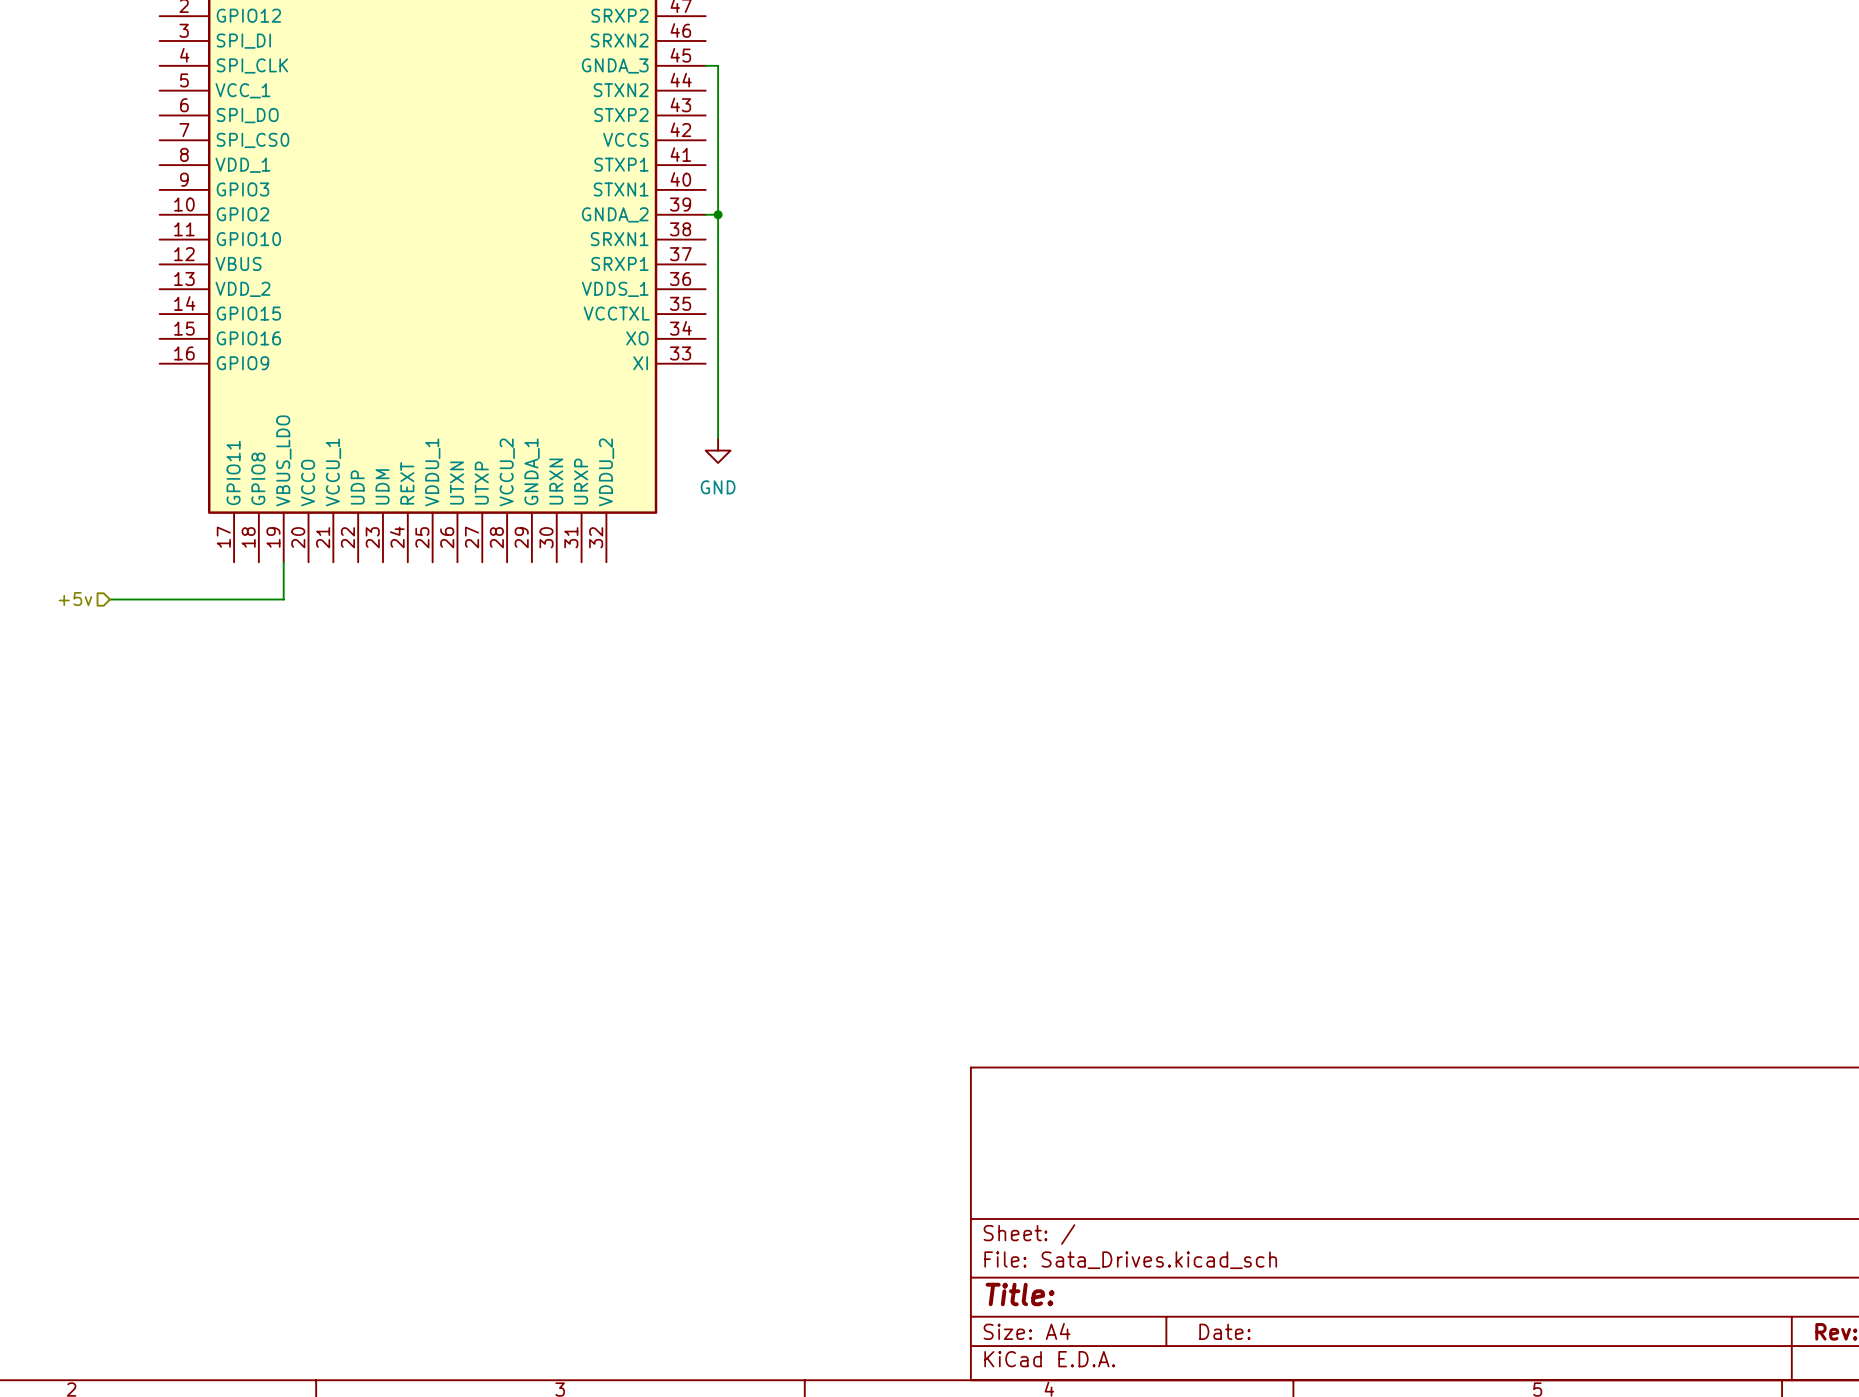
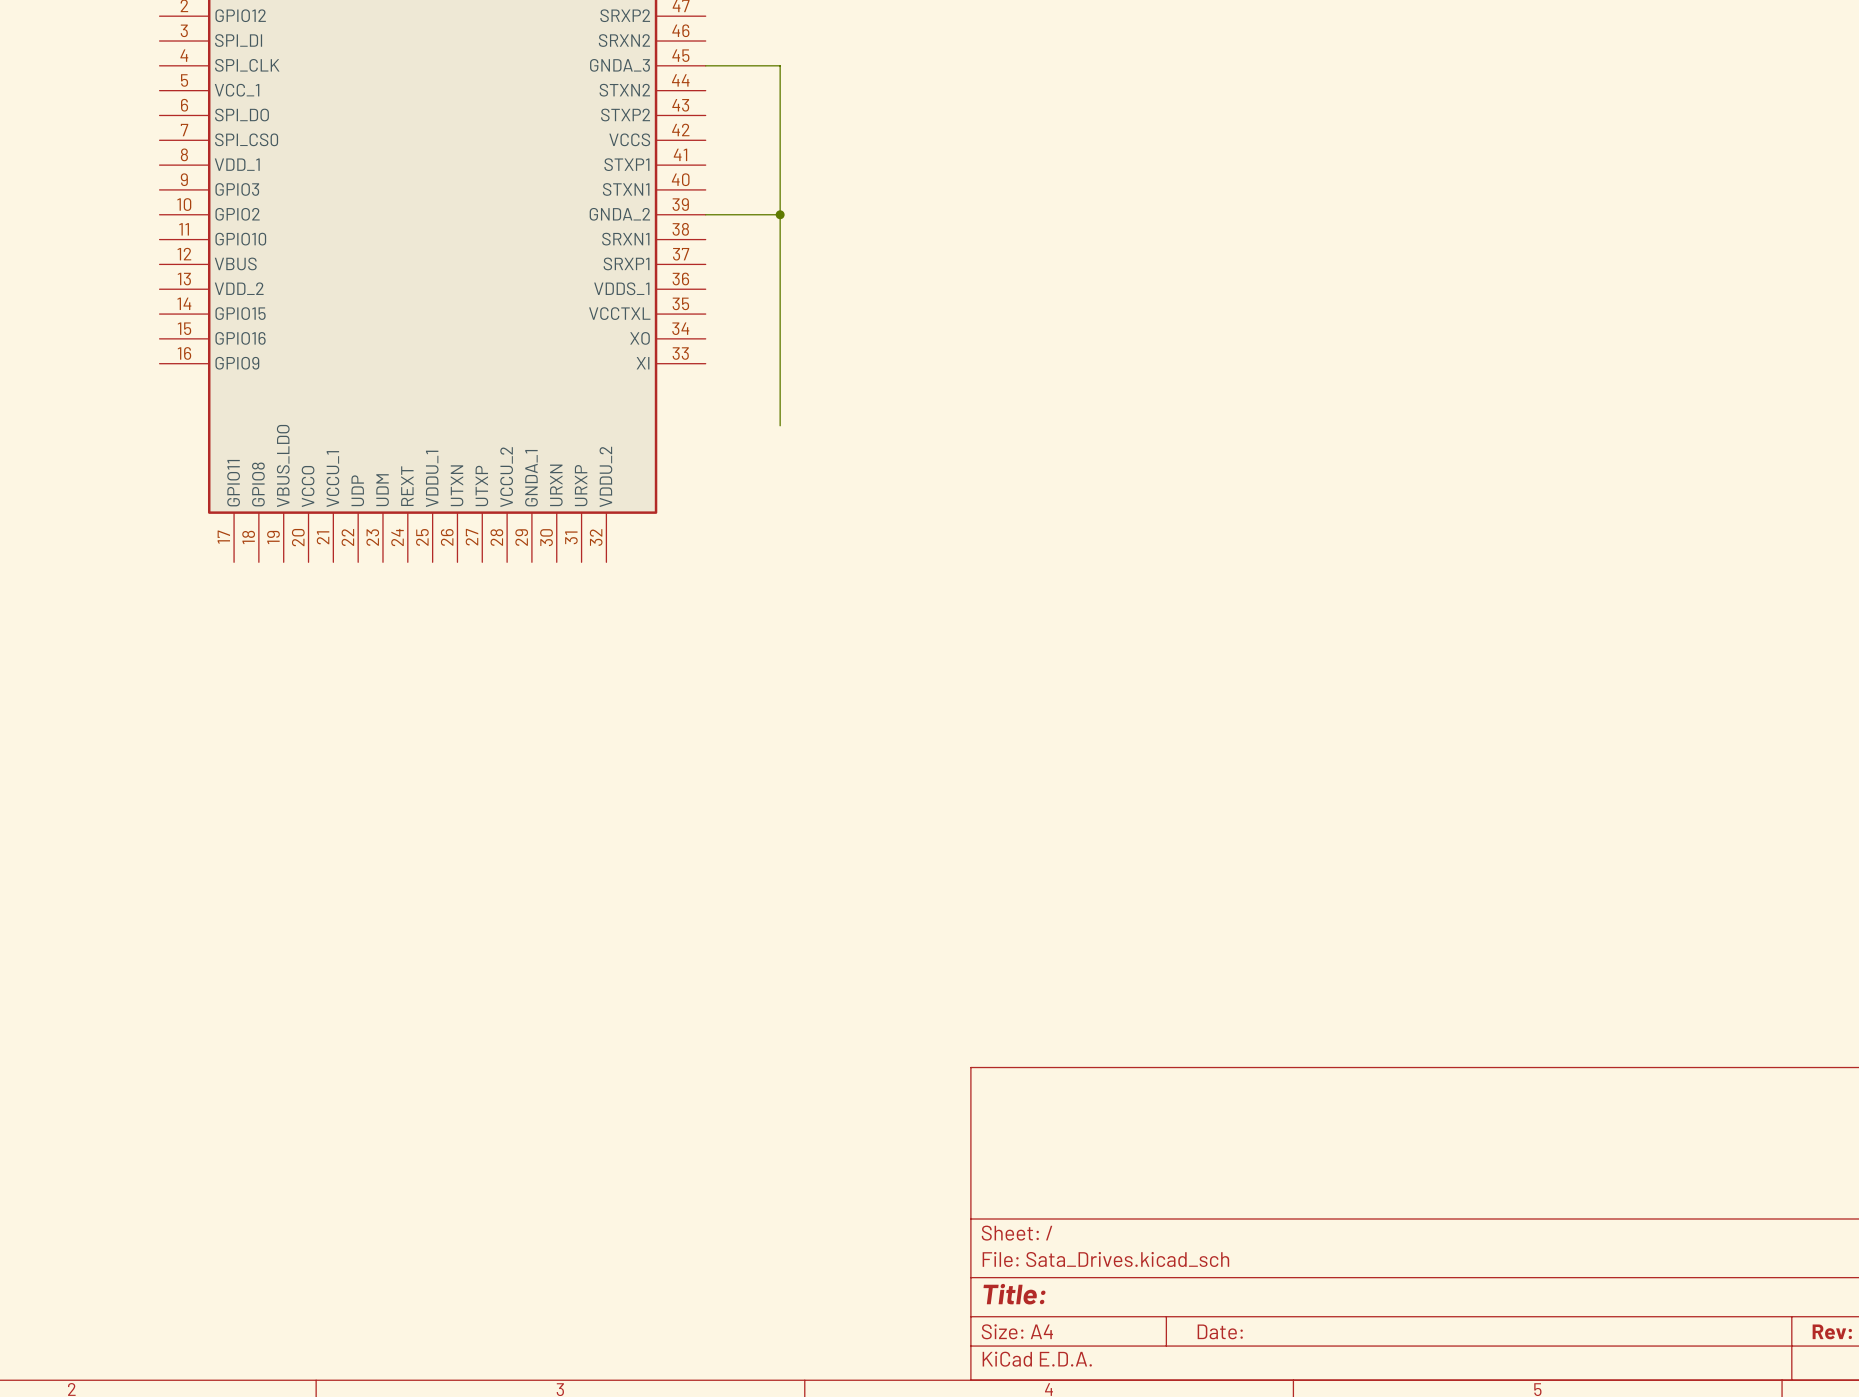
wire: (718, 65) (718, 438) -> (718, 65) (780, 65) (780, 425)
wire: none -> (718, 214) (780, 214)
junction: (718, 214) -> none
junction: none -> (780, 214)
power symbol: GND (718, 450) -> none
wire: (283, 562) (283, 599) (109, 599) -> none
hierarchical label: +5v (75, 599) -> none

